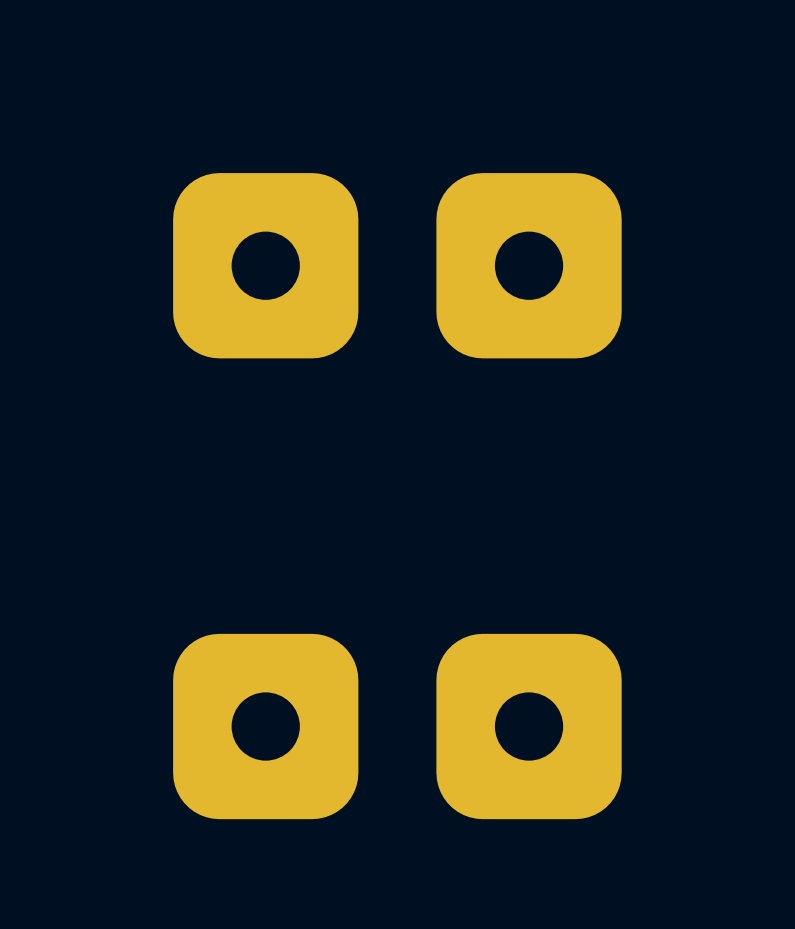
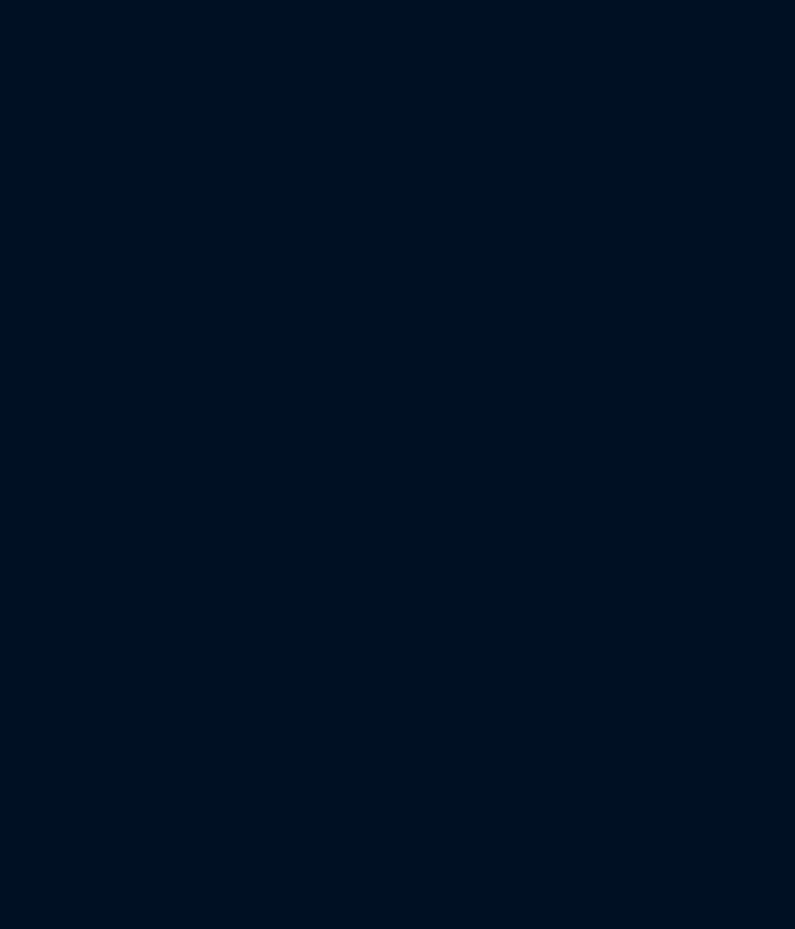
part: (397, 265) -> none
part: (397, 726) -> none

